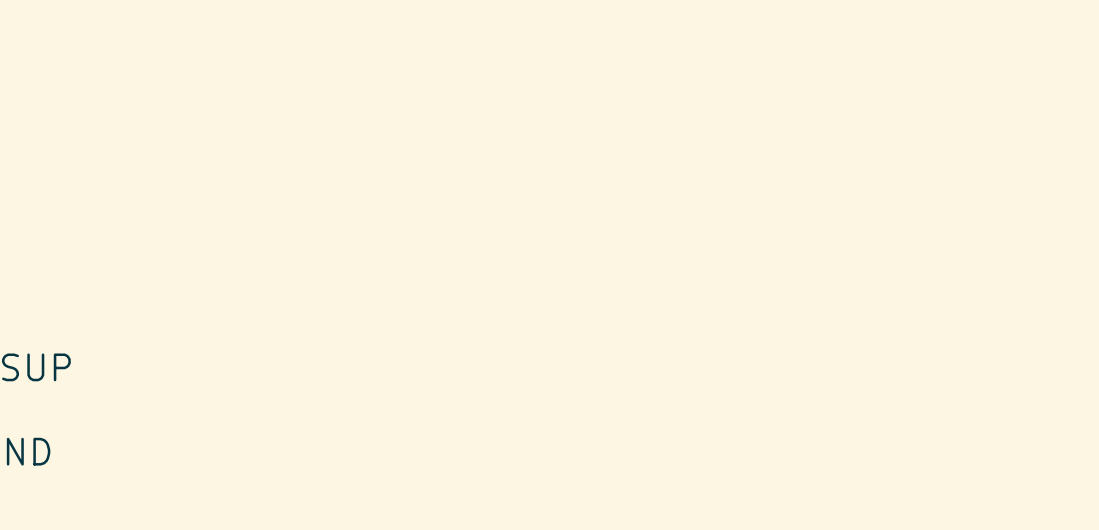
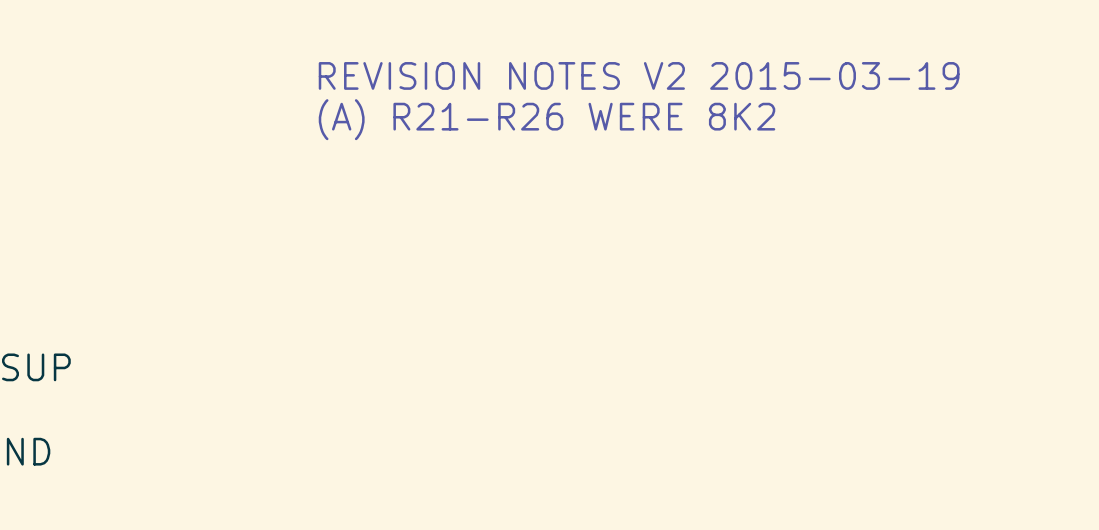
text: none -> REVISION NOTES V2 2015-03-19 (639, 75)
text: none -> (A) R21-R26 WERE 8K2 (547, 119)

